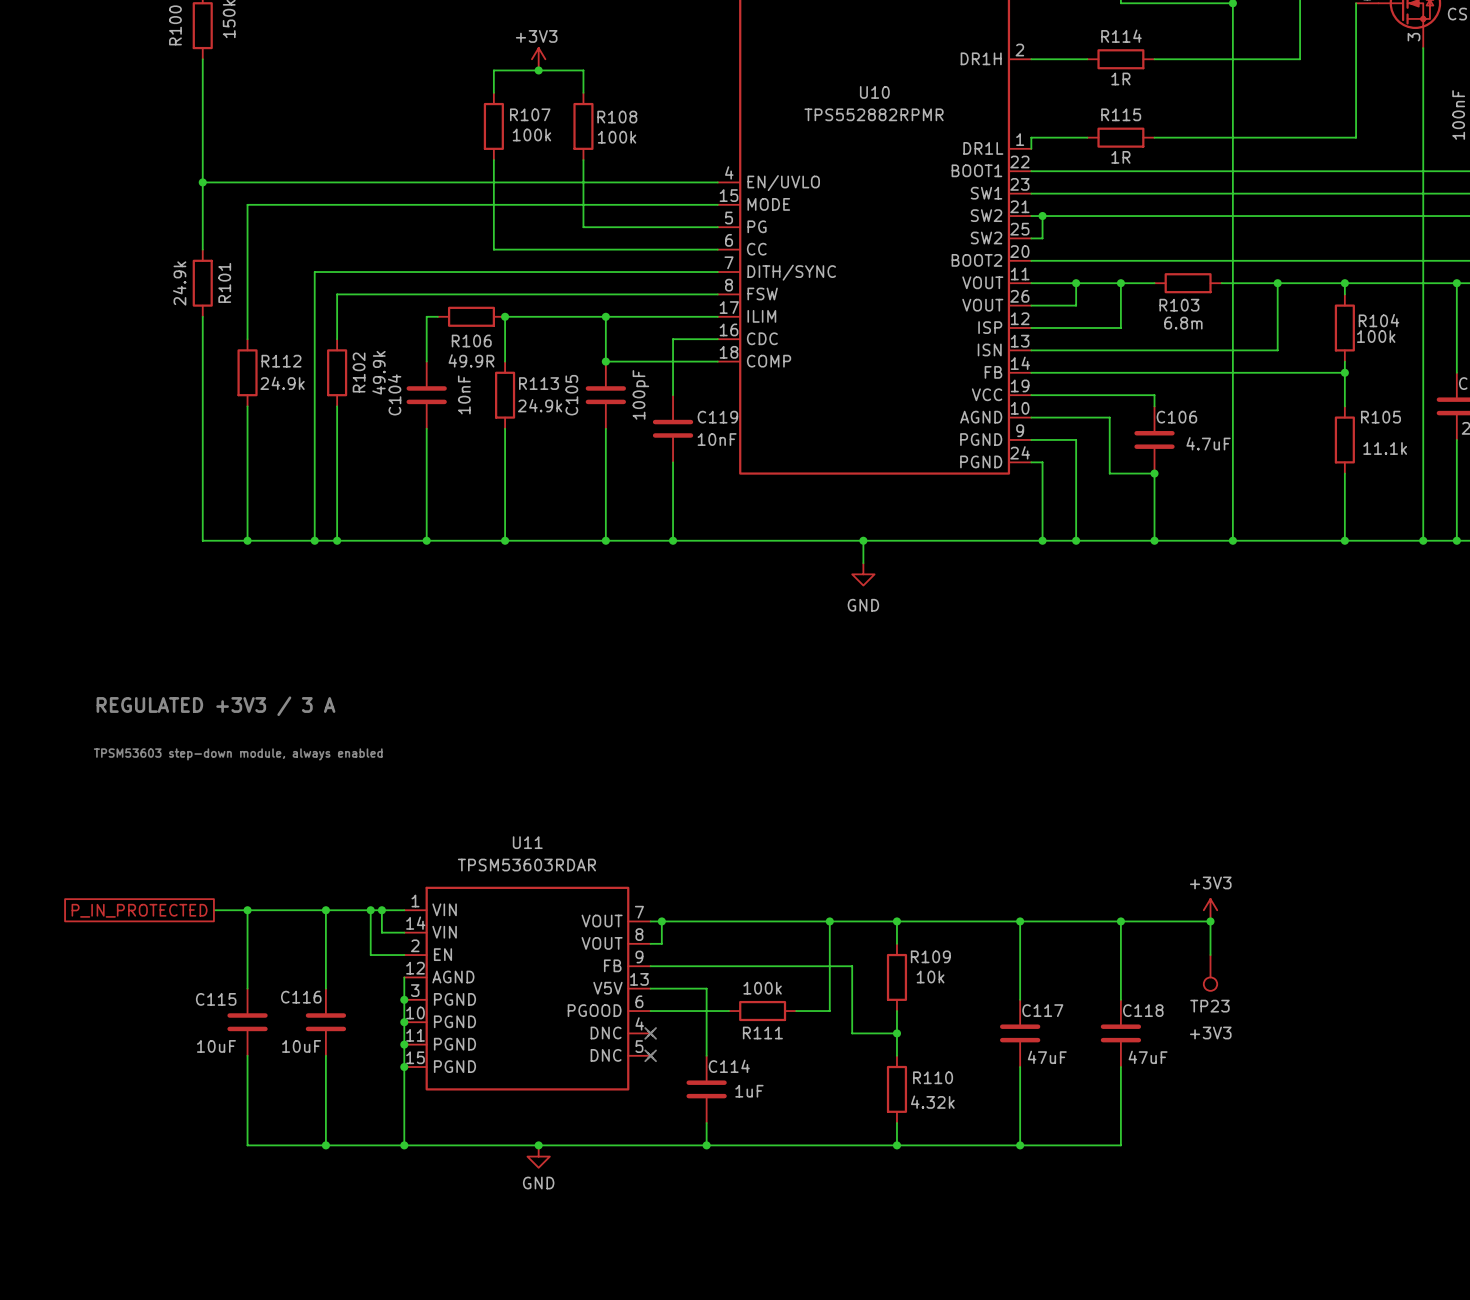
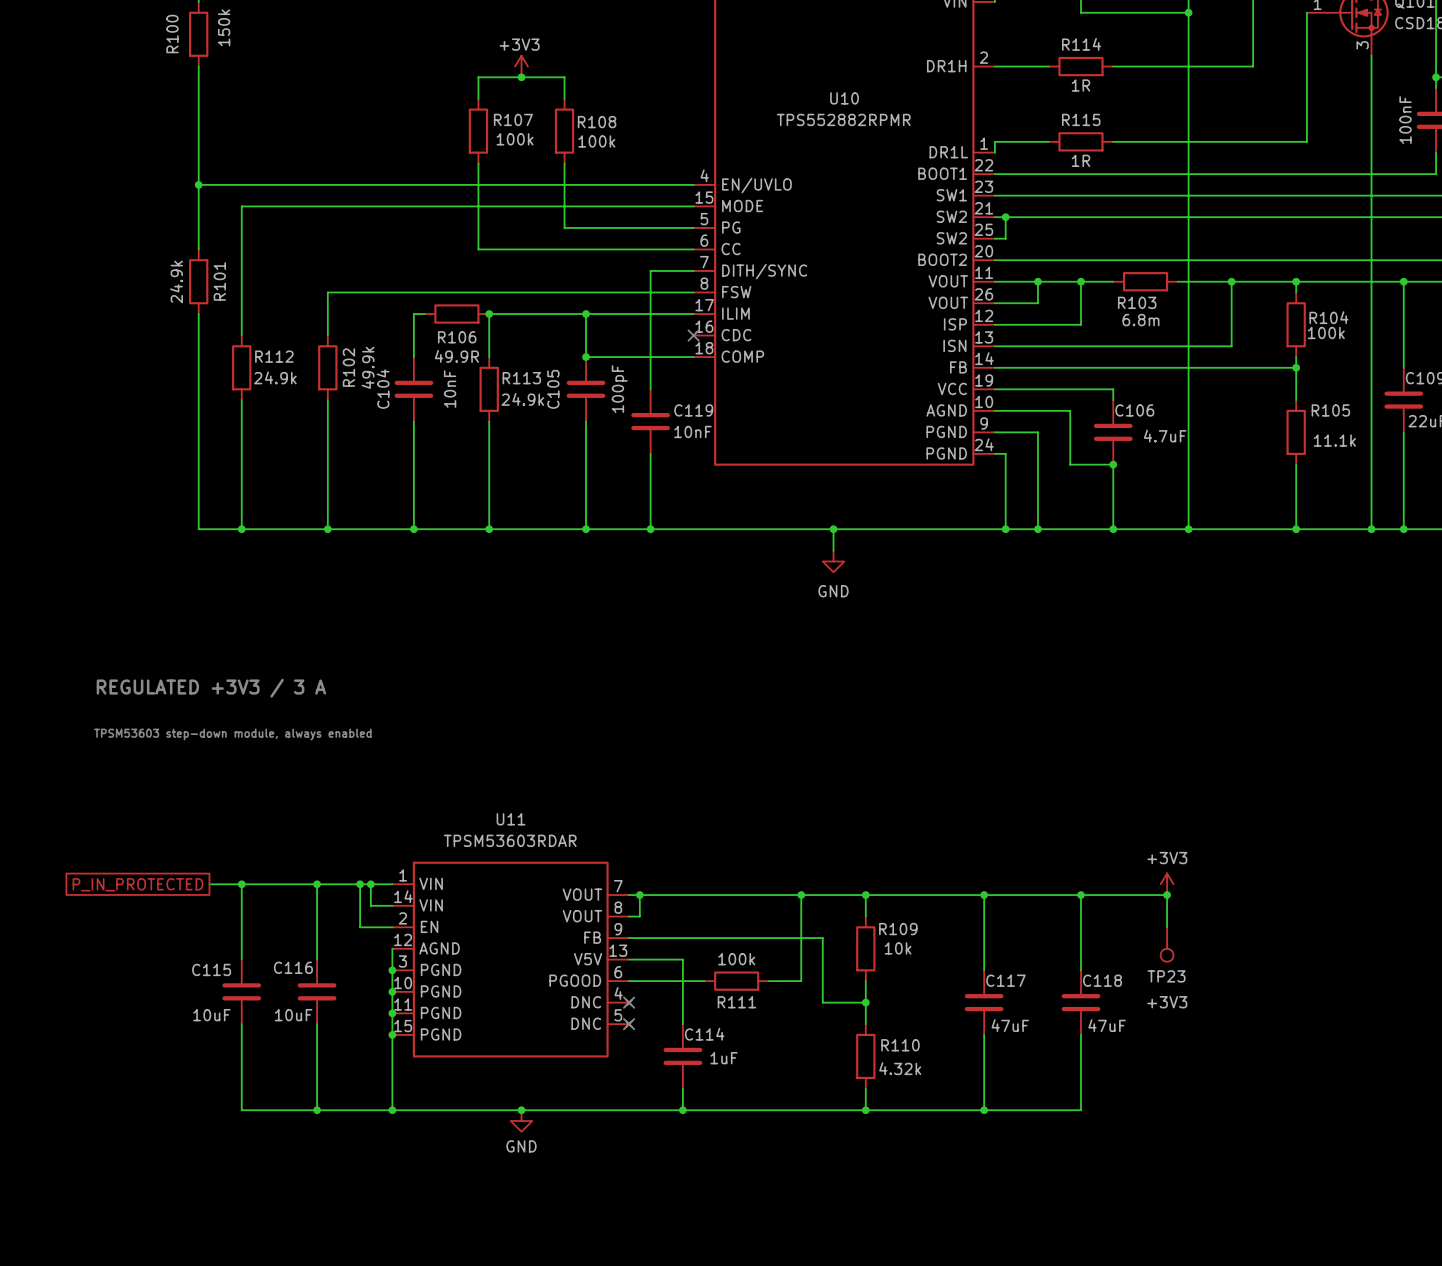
wire: (673, 272) (314, 272) (314, 540) -> none
wire: (673, 339) (717, 339) -> (650, 335) (650, 270)
no-connect mark: none -> (693, 335)
junction: (314, 540) -> none

